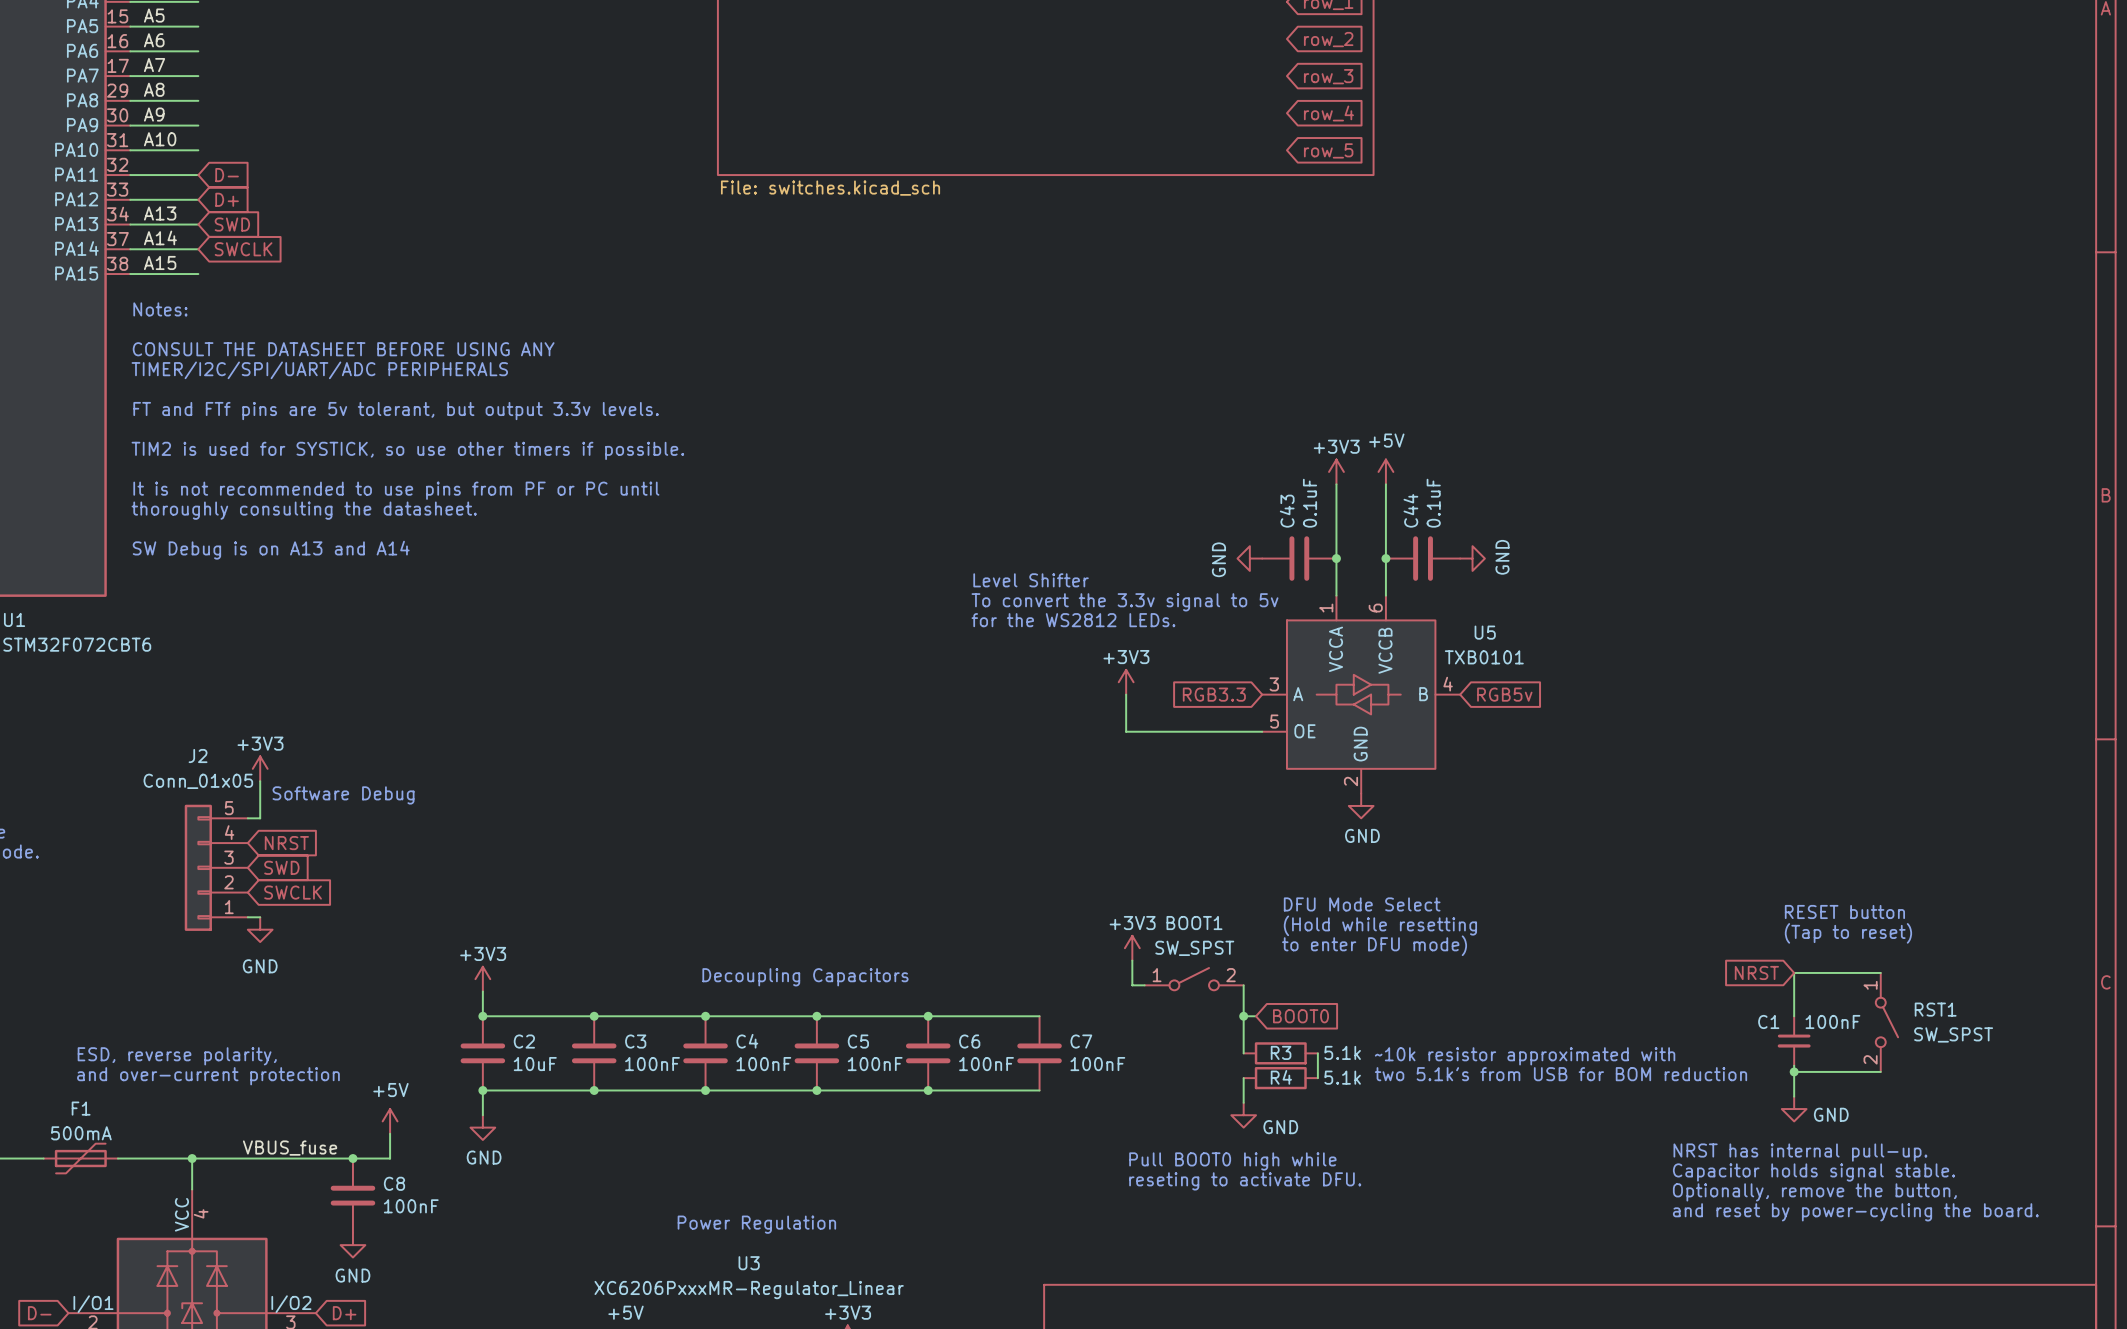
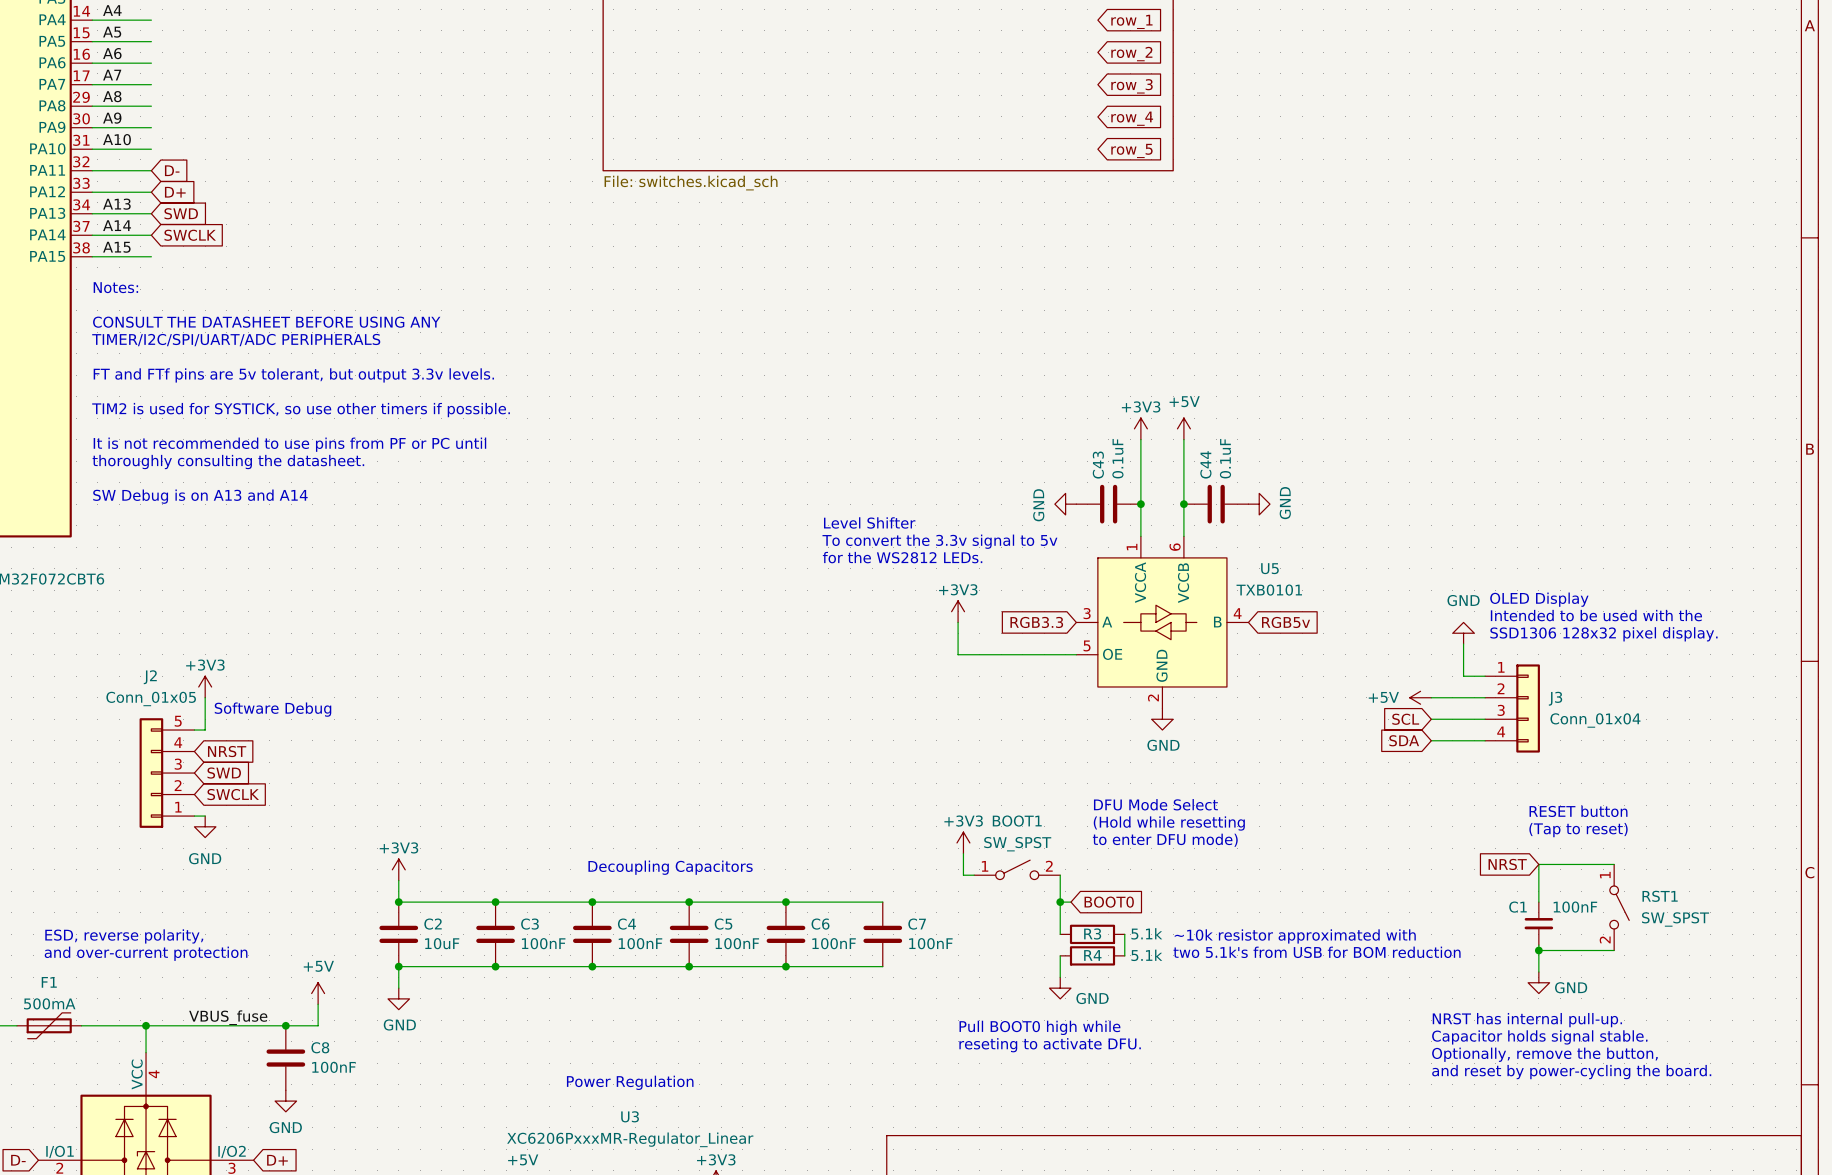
text: none -> OLED Display (1539, 599)
text: none -> Intended to be used with the (1596, 615)
power symbol: none -> GND (1463, 633)
text: none -> SSD1306 128x32 pixel display. (1603, 634)
wire: none -> (1463, 643) (1463, 676) (1485, 676)
power symbol: none -> +5V (1420, 697)
wire: none -> (1431, 697) (1485, 697)
J3: none -> Conn_01x04 (1512, 708)
global label: none -> SCL (1405, 719)
wire: none -> (1431, 719) (1485, 719)
global label: none -> SDA (1404, 740)
wire: none -> (1431, 740) (1485, 740)

